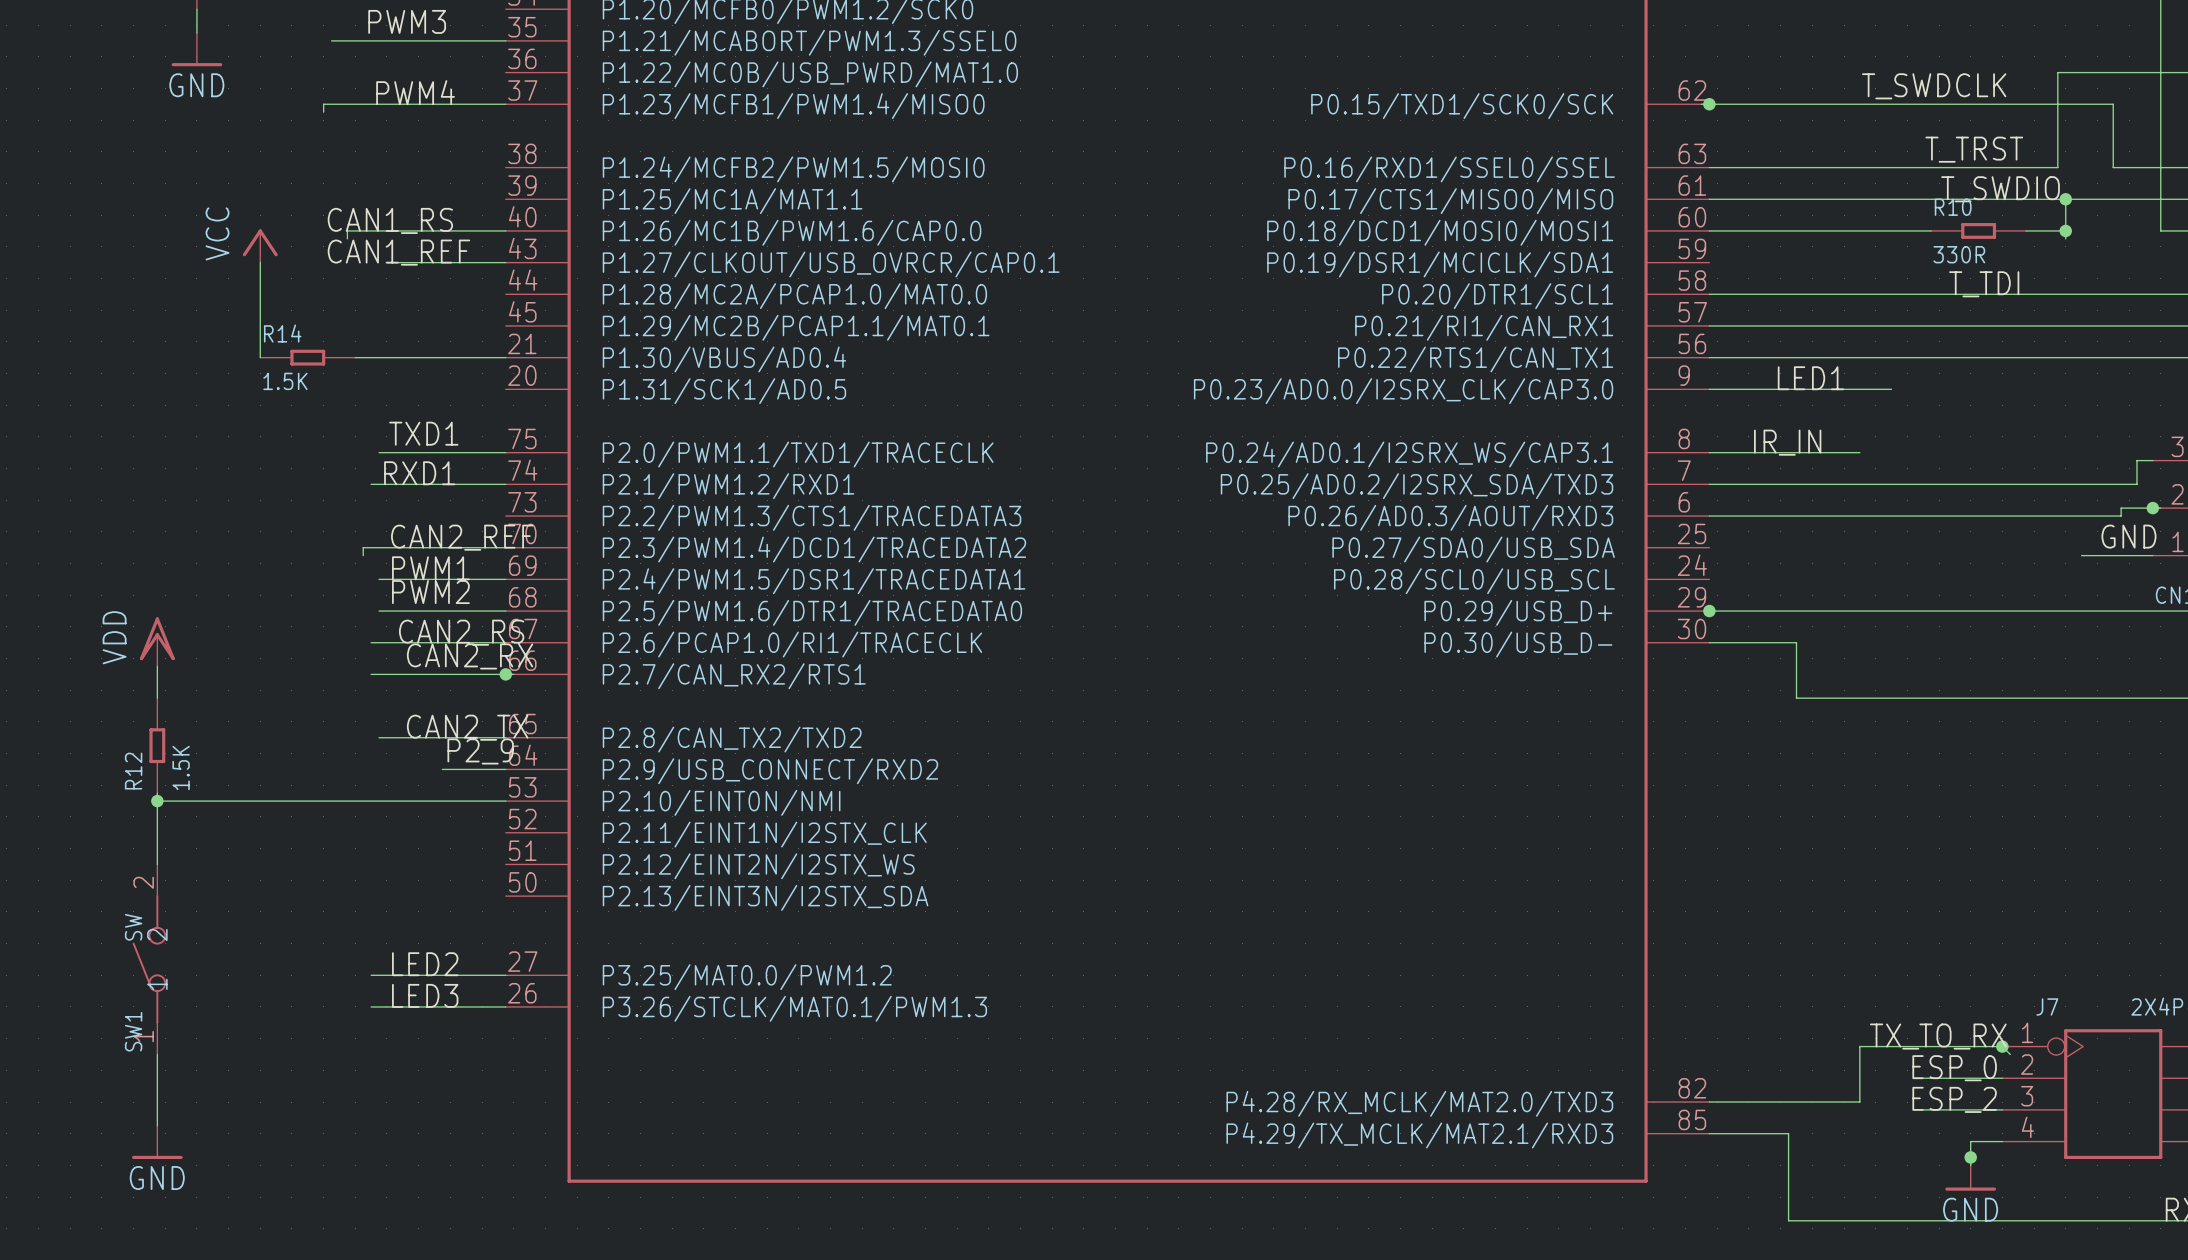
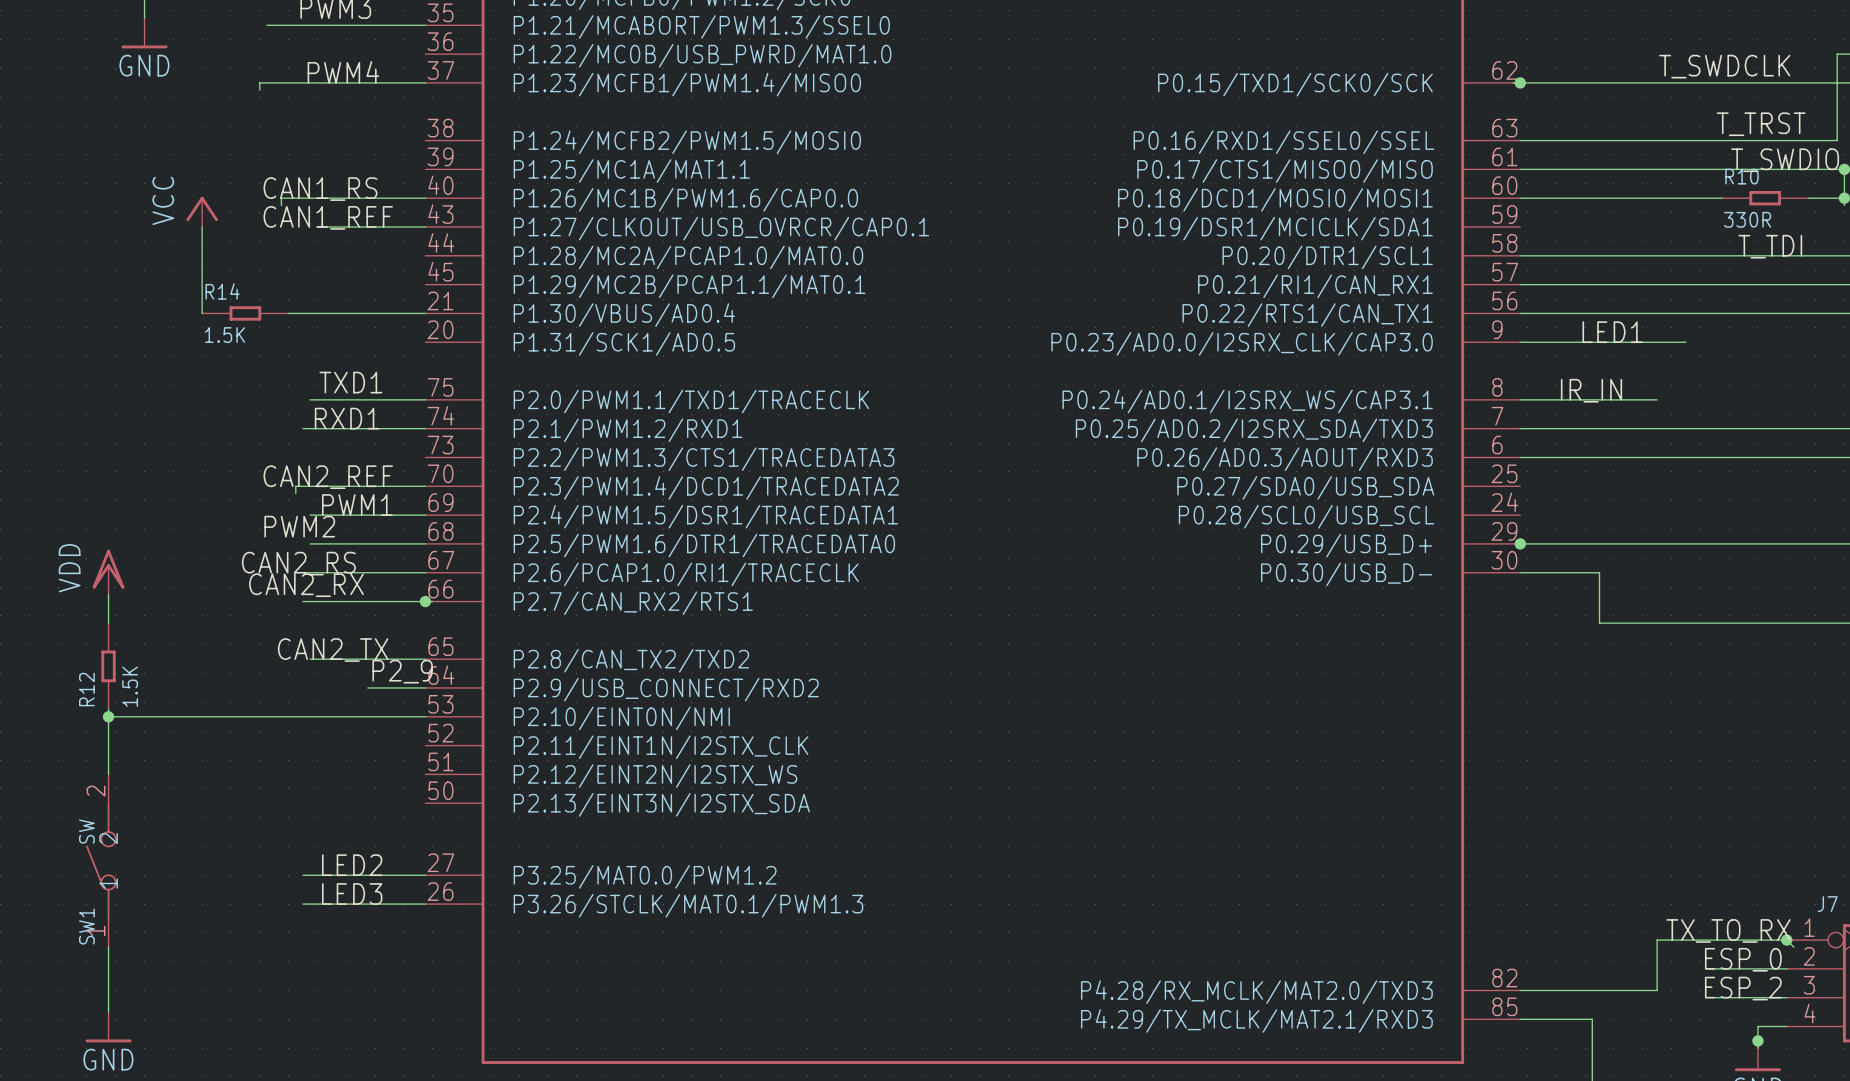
label position: CAN2_REF (462, 537) -> CAN2_REF (328, 477)
label position: PWM2 (430, 592) -> PWM2 (299, 526)
label position: CAN2_RS (461, 632) -> CAN2_RS (298, 563)
label position: CAN2_RX (470, 656) -> CAN2_RX (306, 585)
label position: CAN2_TX (467, 727) -> CAN2_TX (333, 650)

